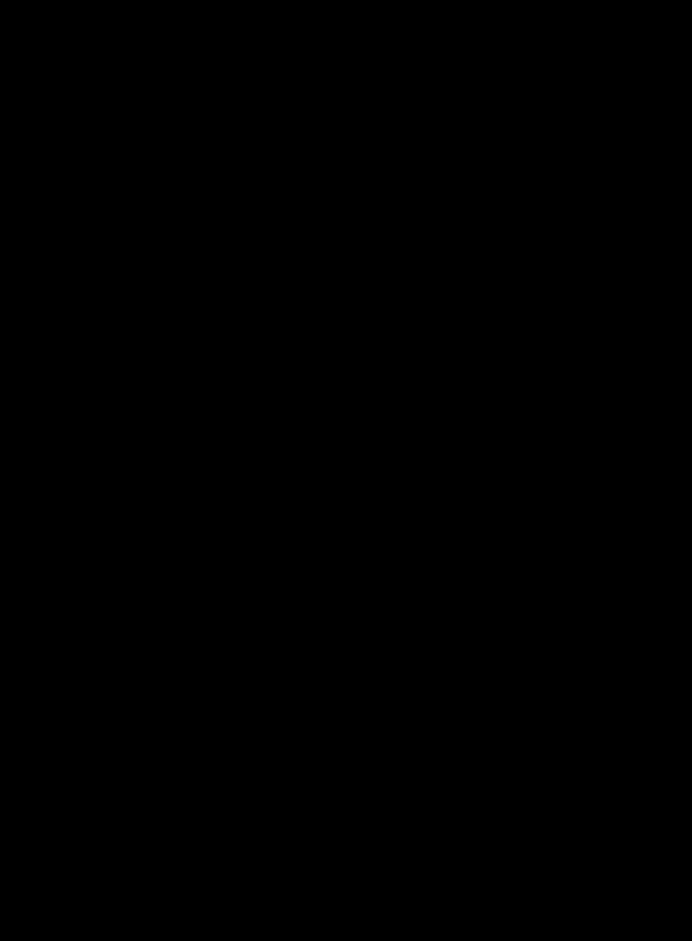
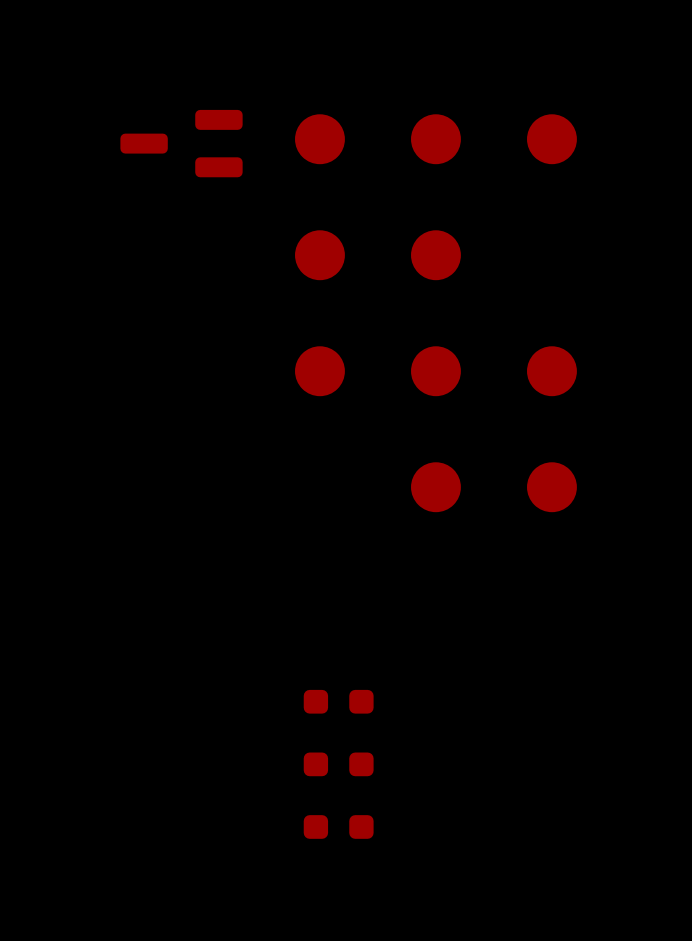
part: none -> (319, 139)
part: none -> (435, 139)
part: none -> (551, 139)
part: none -> (181, 143)
part: none -> (319, 255)
part: none -> (435, 255)
part: none -> (319, 371)
part: none -> (435, 371)
part: none -> (551, 371)
part: none -> (435, 487)
part: none -> (551, 487)
part: none -> (338, 701)
part: none -> (338, 764)
part: none -> (338, 826)

